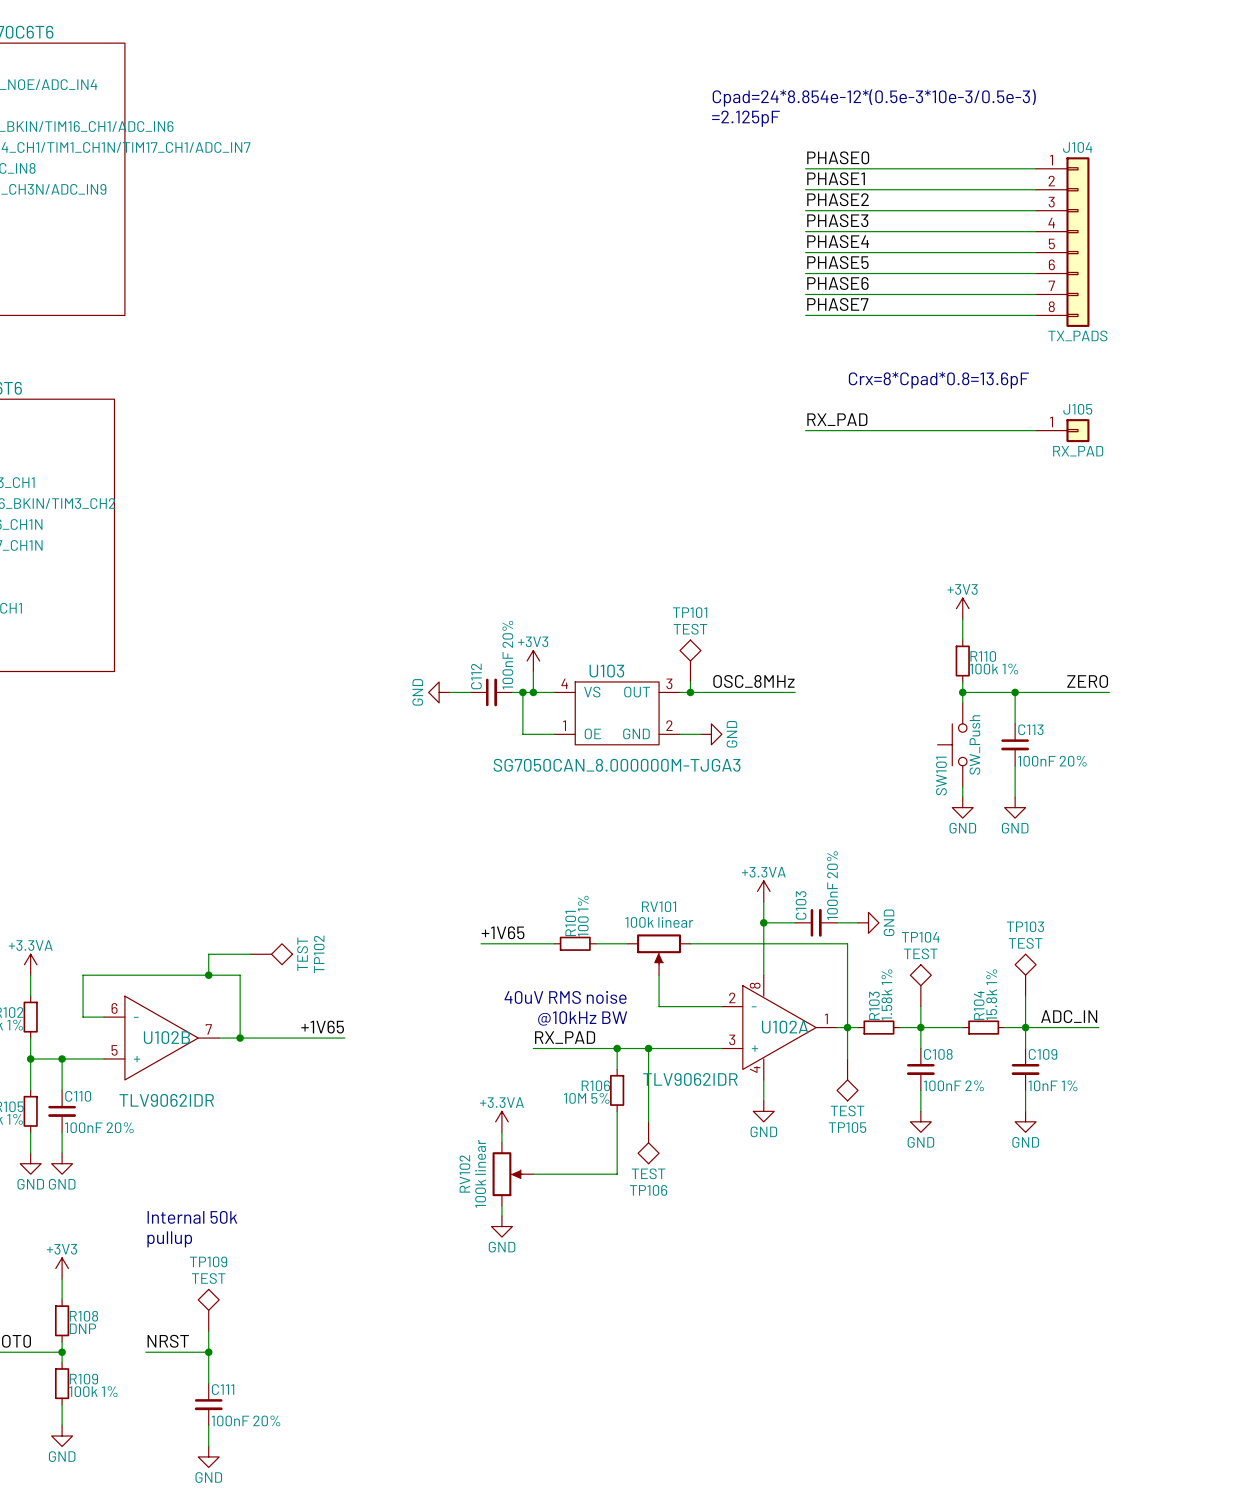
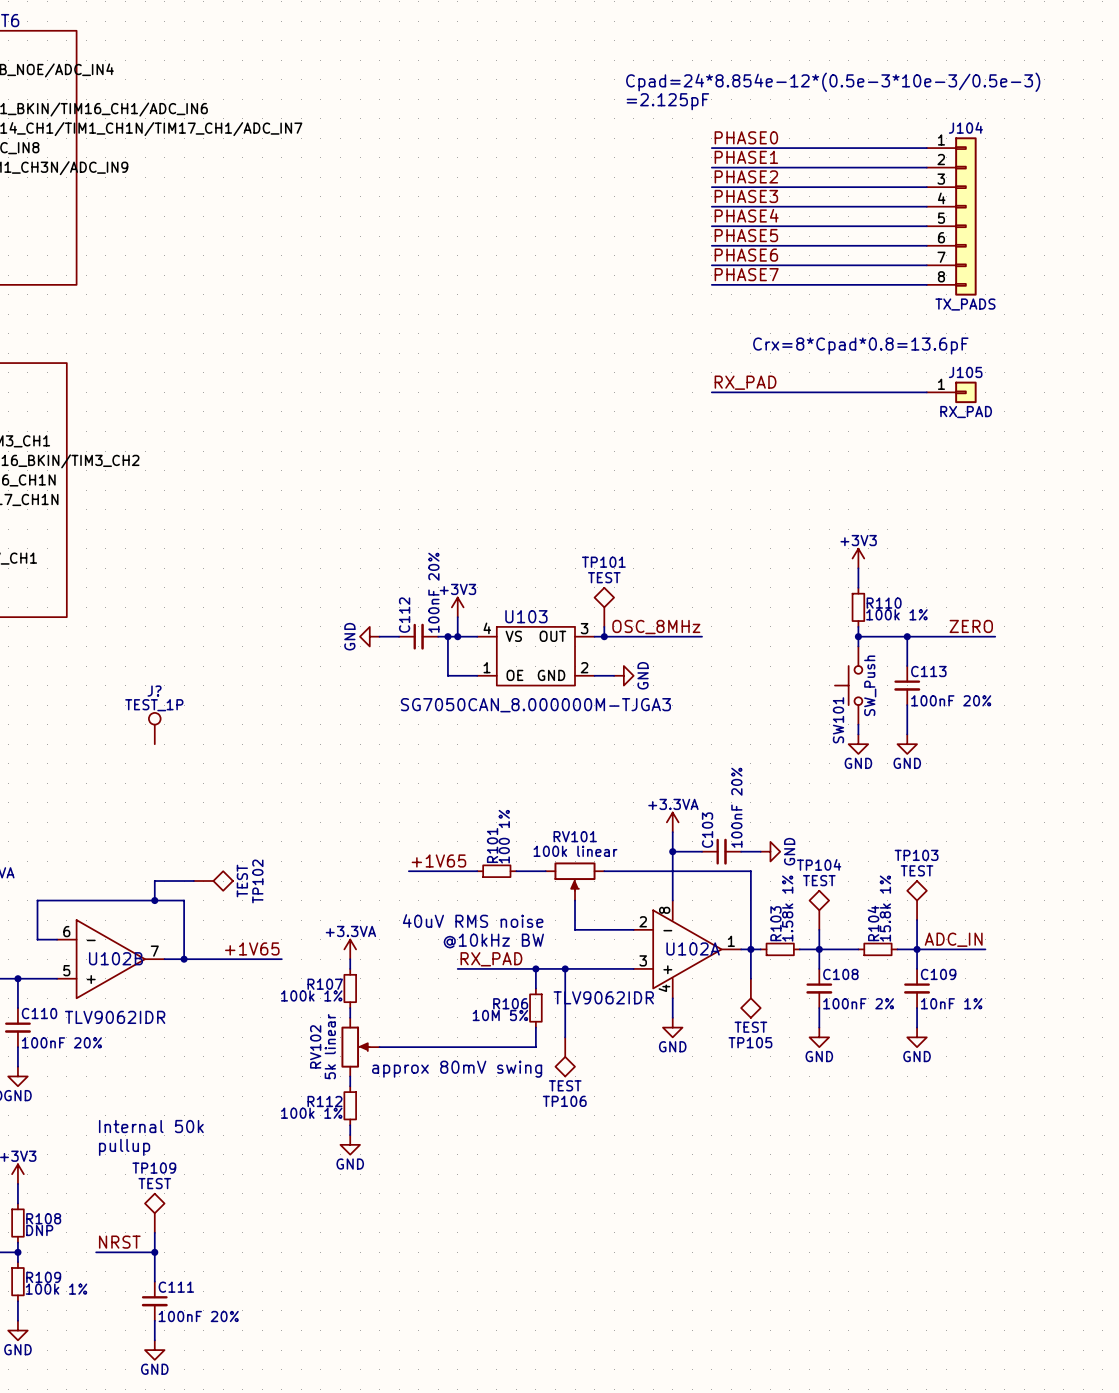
J?: none -> TEST_1P (154, 728)
wire: none -> (350, 959) (350, 968)
R107: none -> 100k 1% (350, 988)
power symbol position: +3.3VA (501, 1121) -> +3.3VA (350, 949)
wire: (501, 1132) (501, 1142) -> (350, 1008) (350, 1017)
wire: (617, 1132) (617, 1174) (533, 1174) -> (535, 1047) (379, 1047)
text: none -> approx 80mV swing (457, 1069)
RV102 value: 100k linear (480, 1173) -> 5k linear (330, 1046)
RV102 flip: as is (507, 1174) -> up-down (355, 1047)
RV102 position: (512, 1174) -> (360, 1047)
R112: none -> 100k 1% (350, 1105)
wire: (501, 1205) (501, 1216) -> (350, 1076) (350, 1086)
wire: none -> (350, 1125) (350, 1135)
power symbol position: GND (501, 1226) -> GND (350, 1144)

